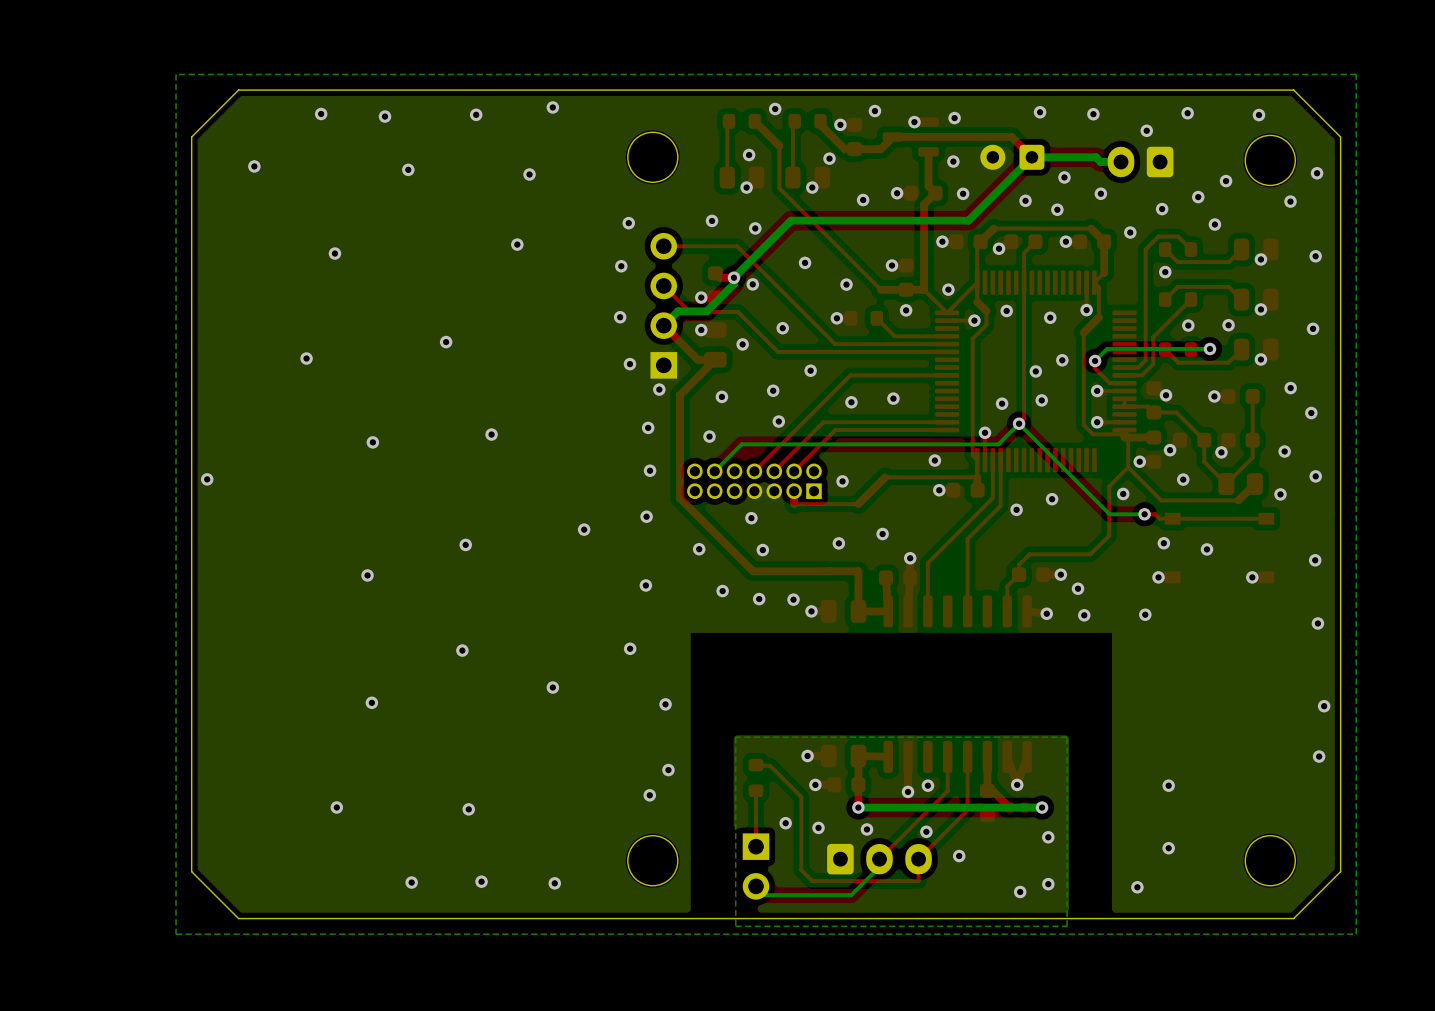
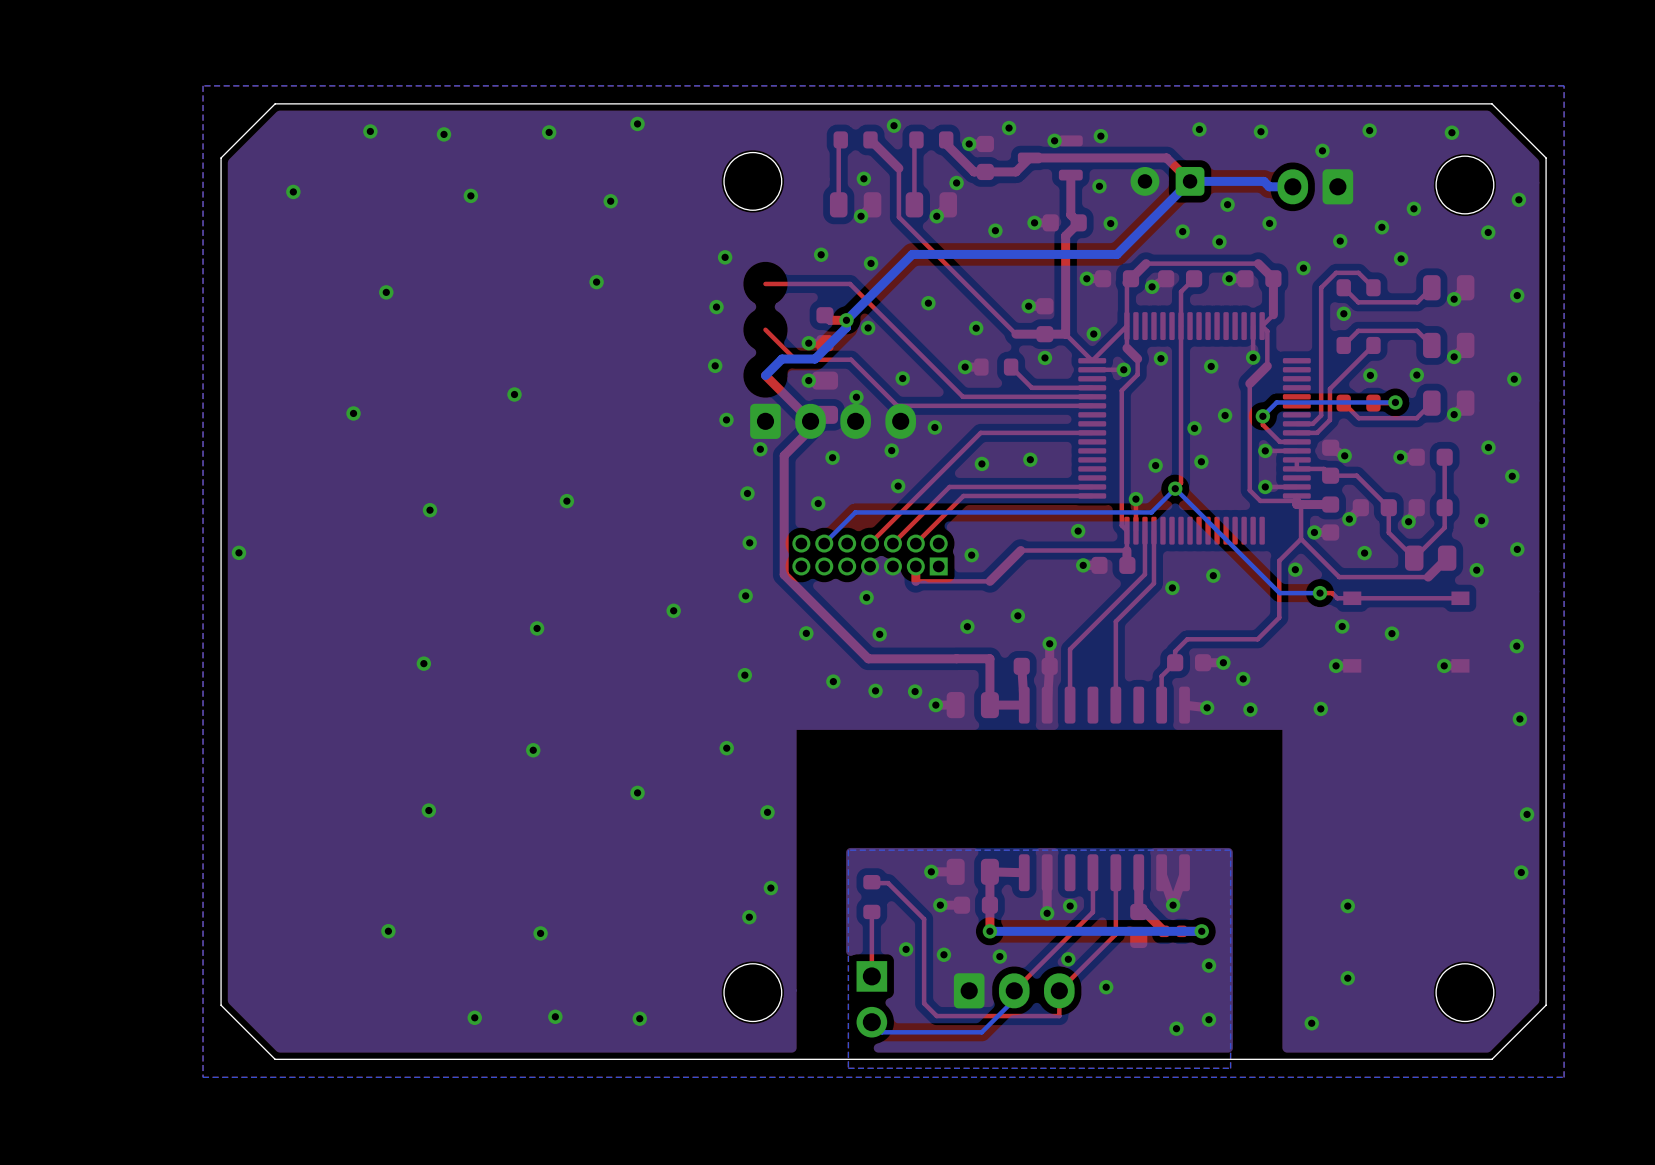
part: (663, 305) -> none
part: none -> (833, 421)

